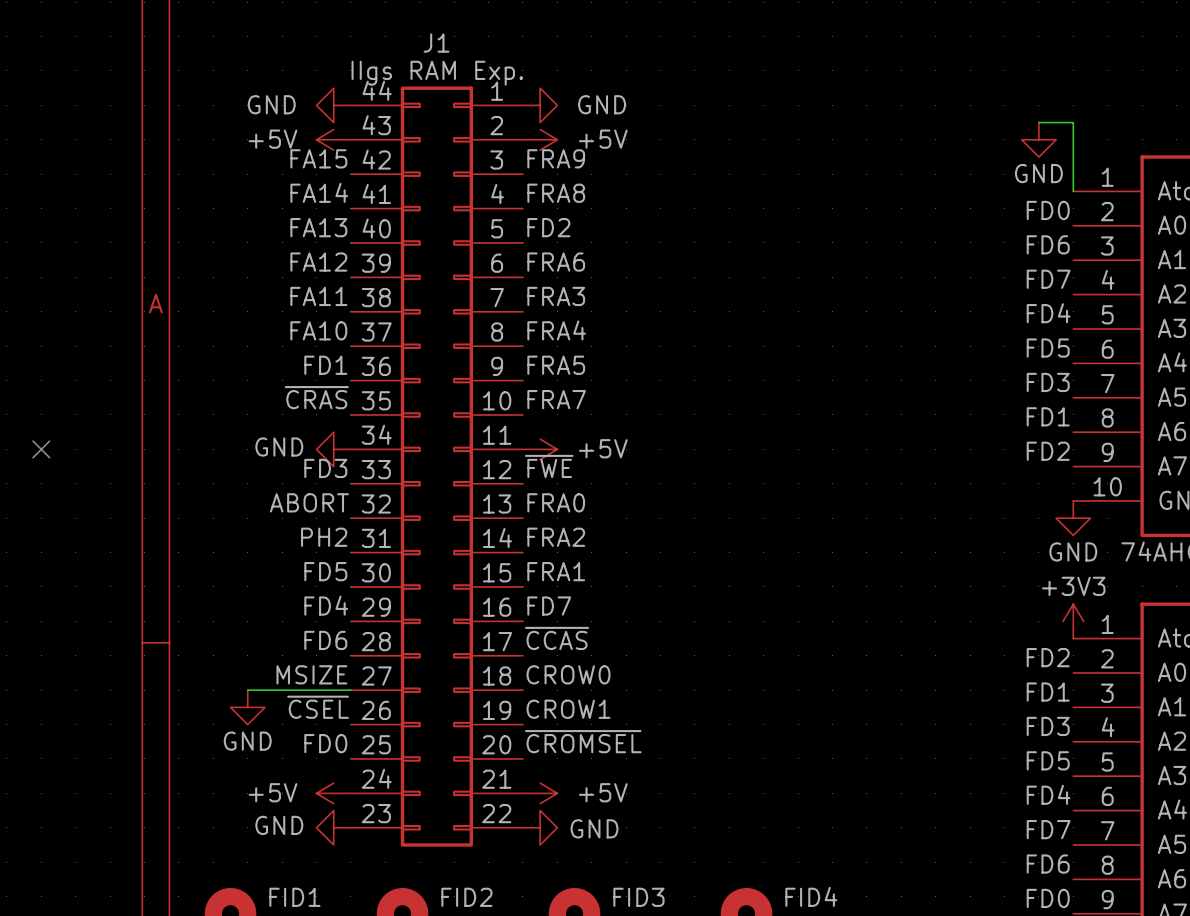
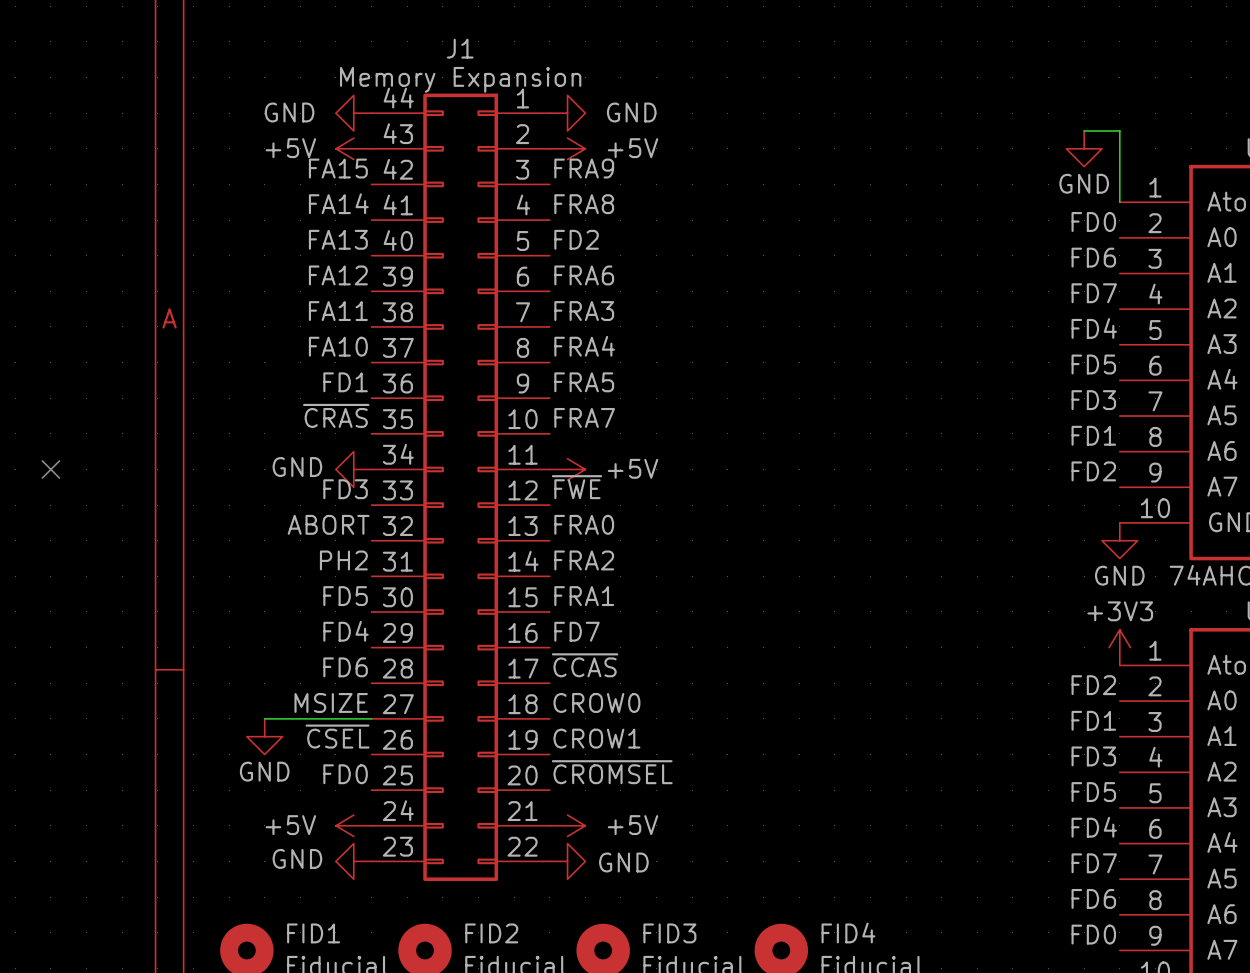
J1 value: IIgs RAM Exp. (437, 73) -> Memory Expansion (460, 79)

